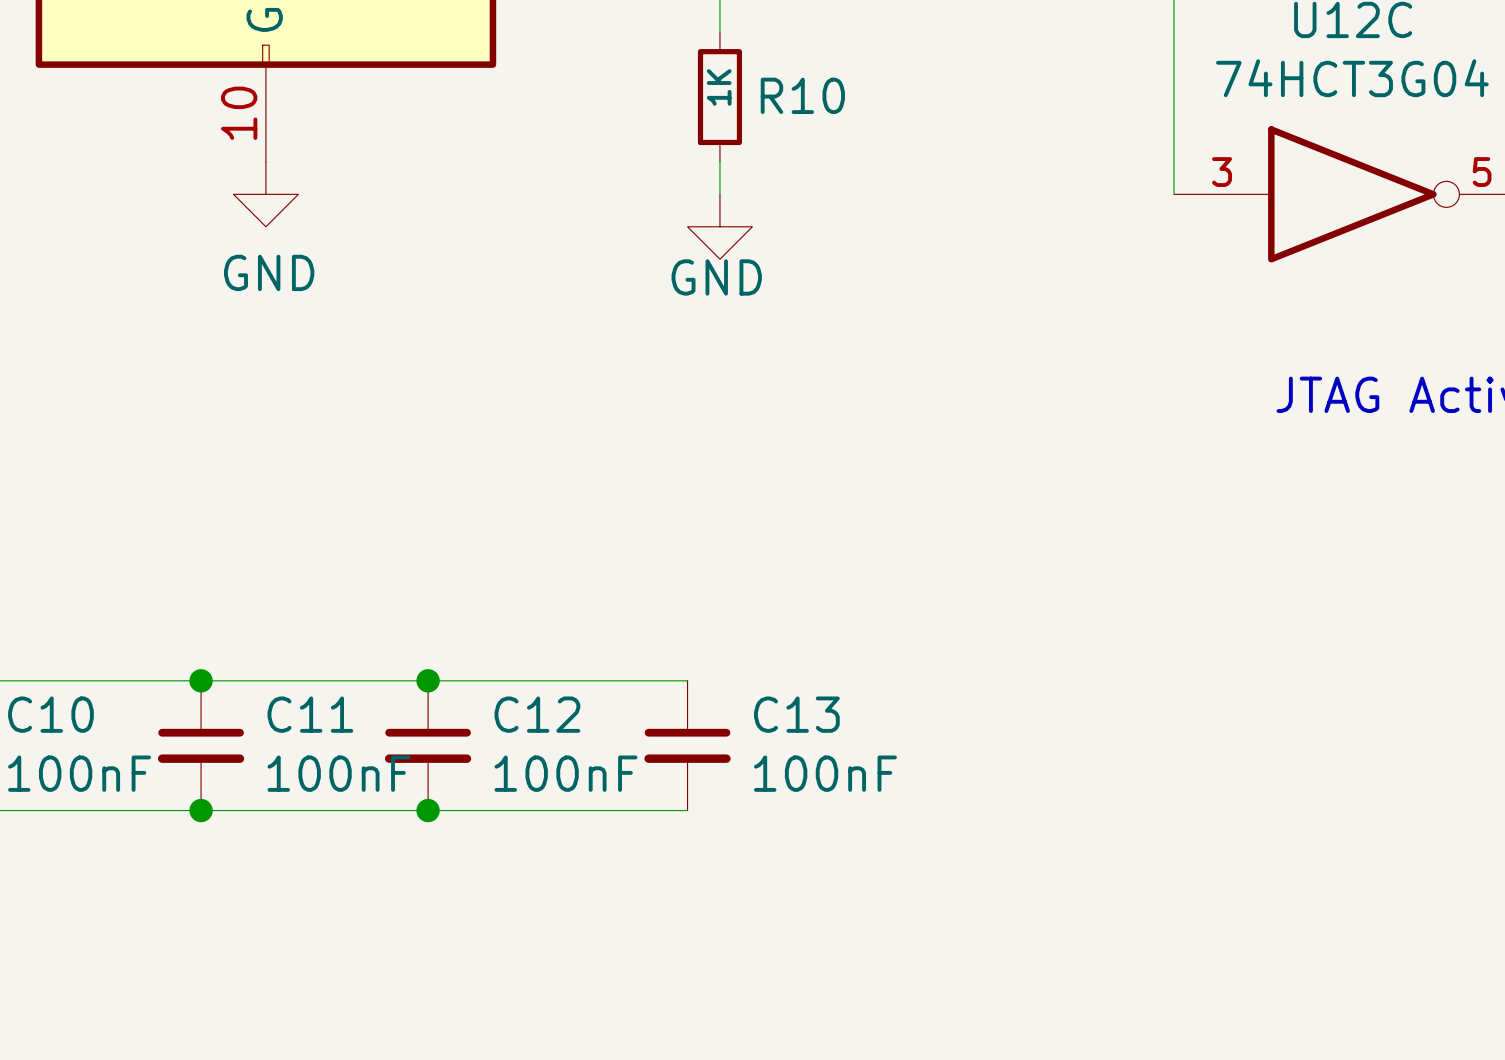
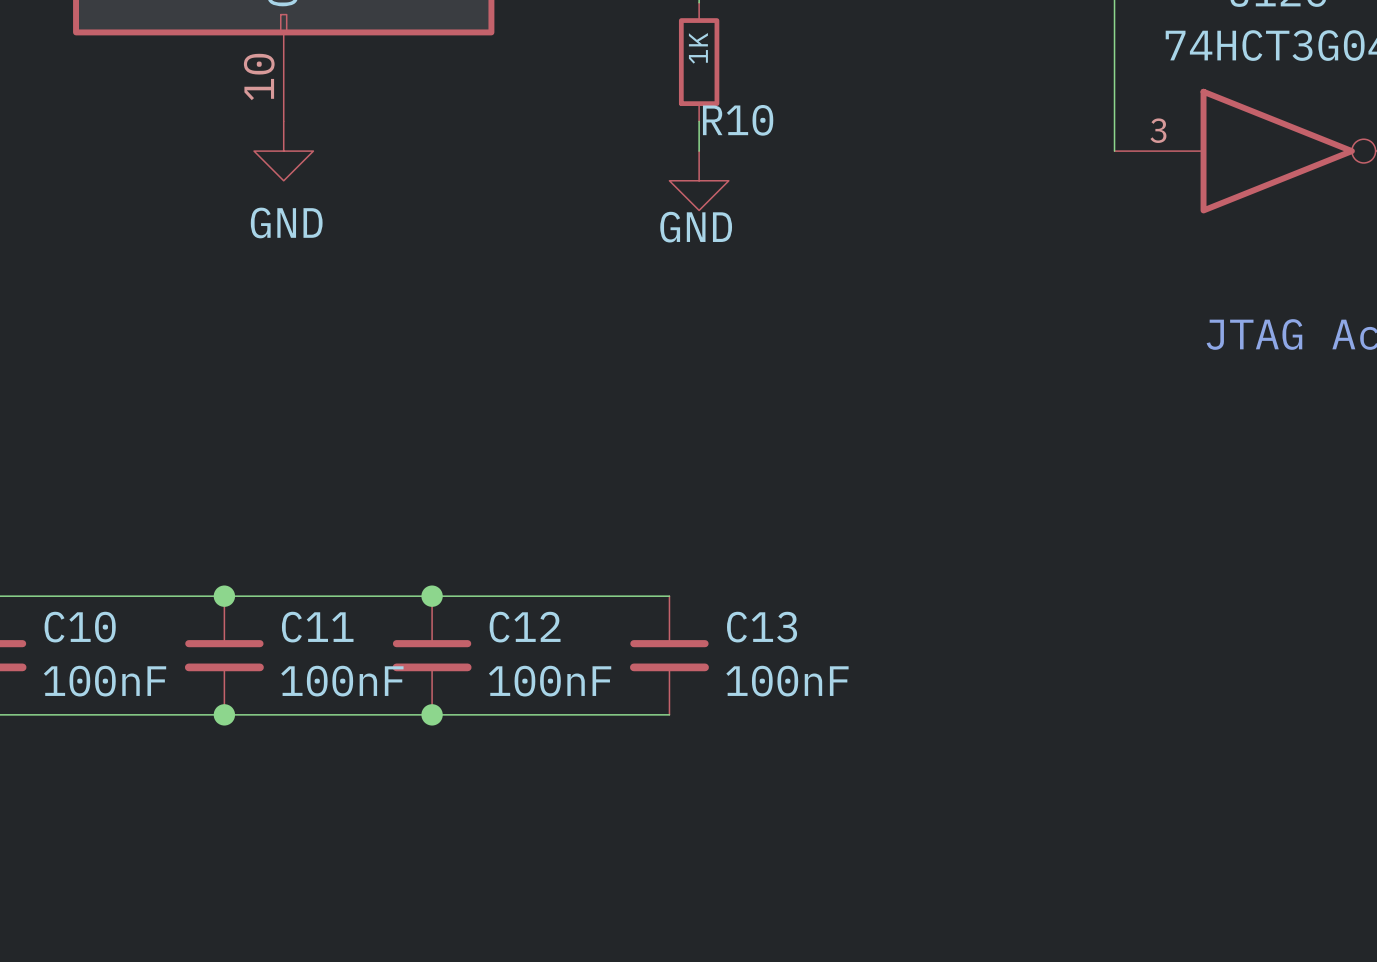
R10 name position: R10 (802, 95) -> R10 (738, 120)

